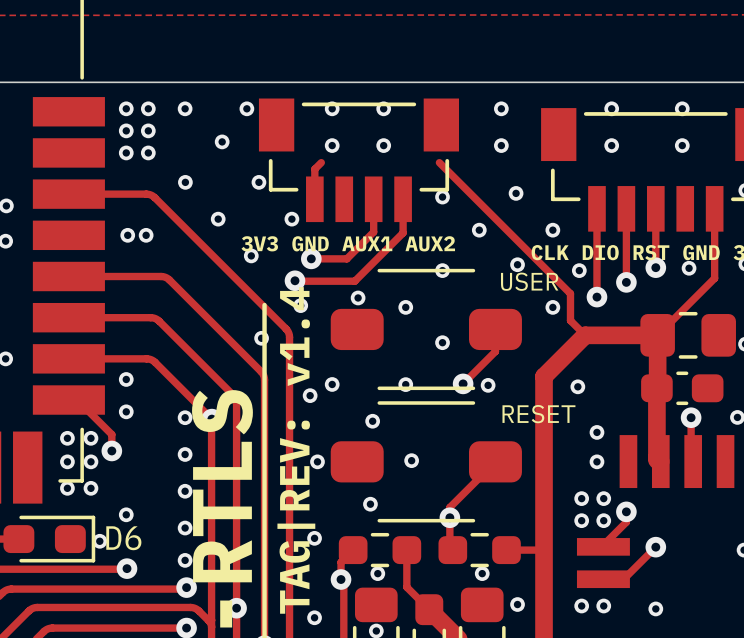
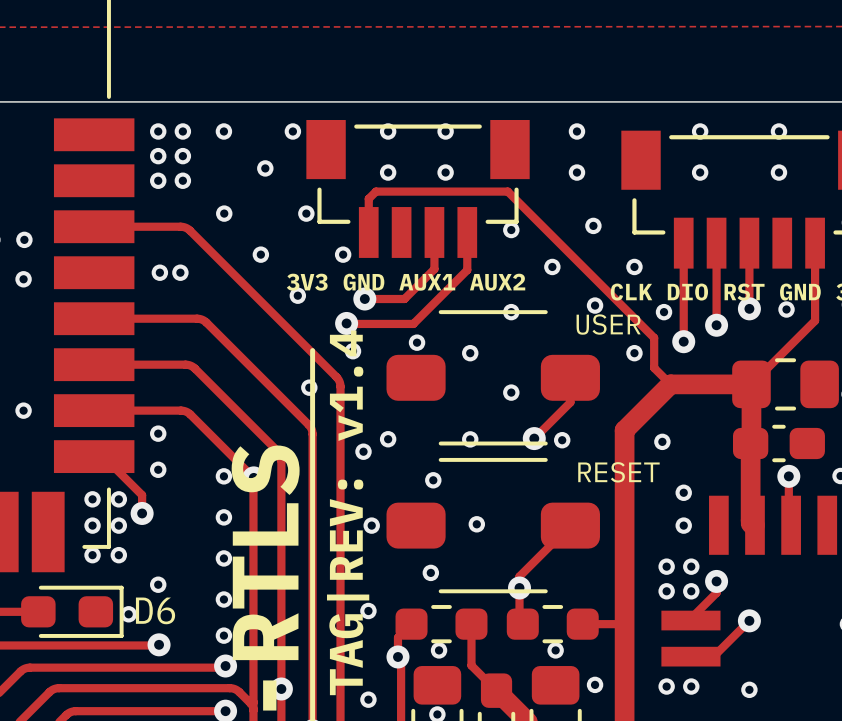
track: none -> (375, 191) (507, 191)

